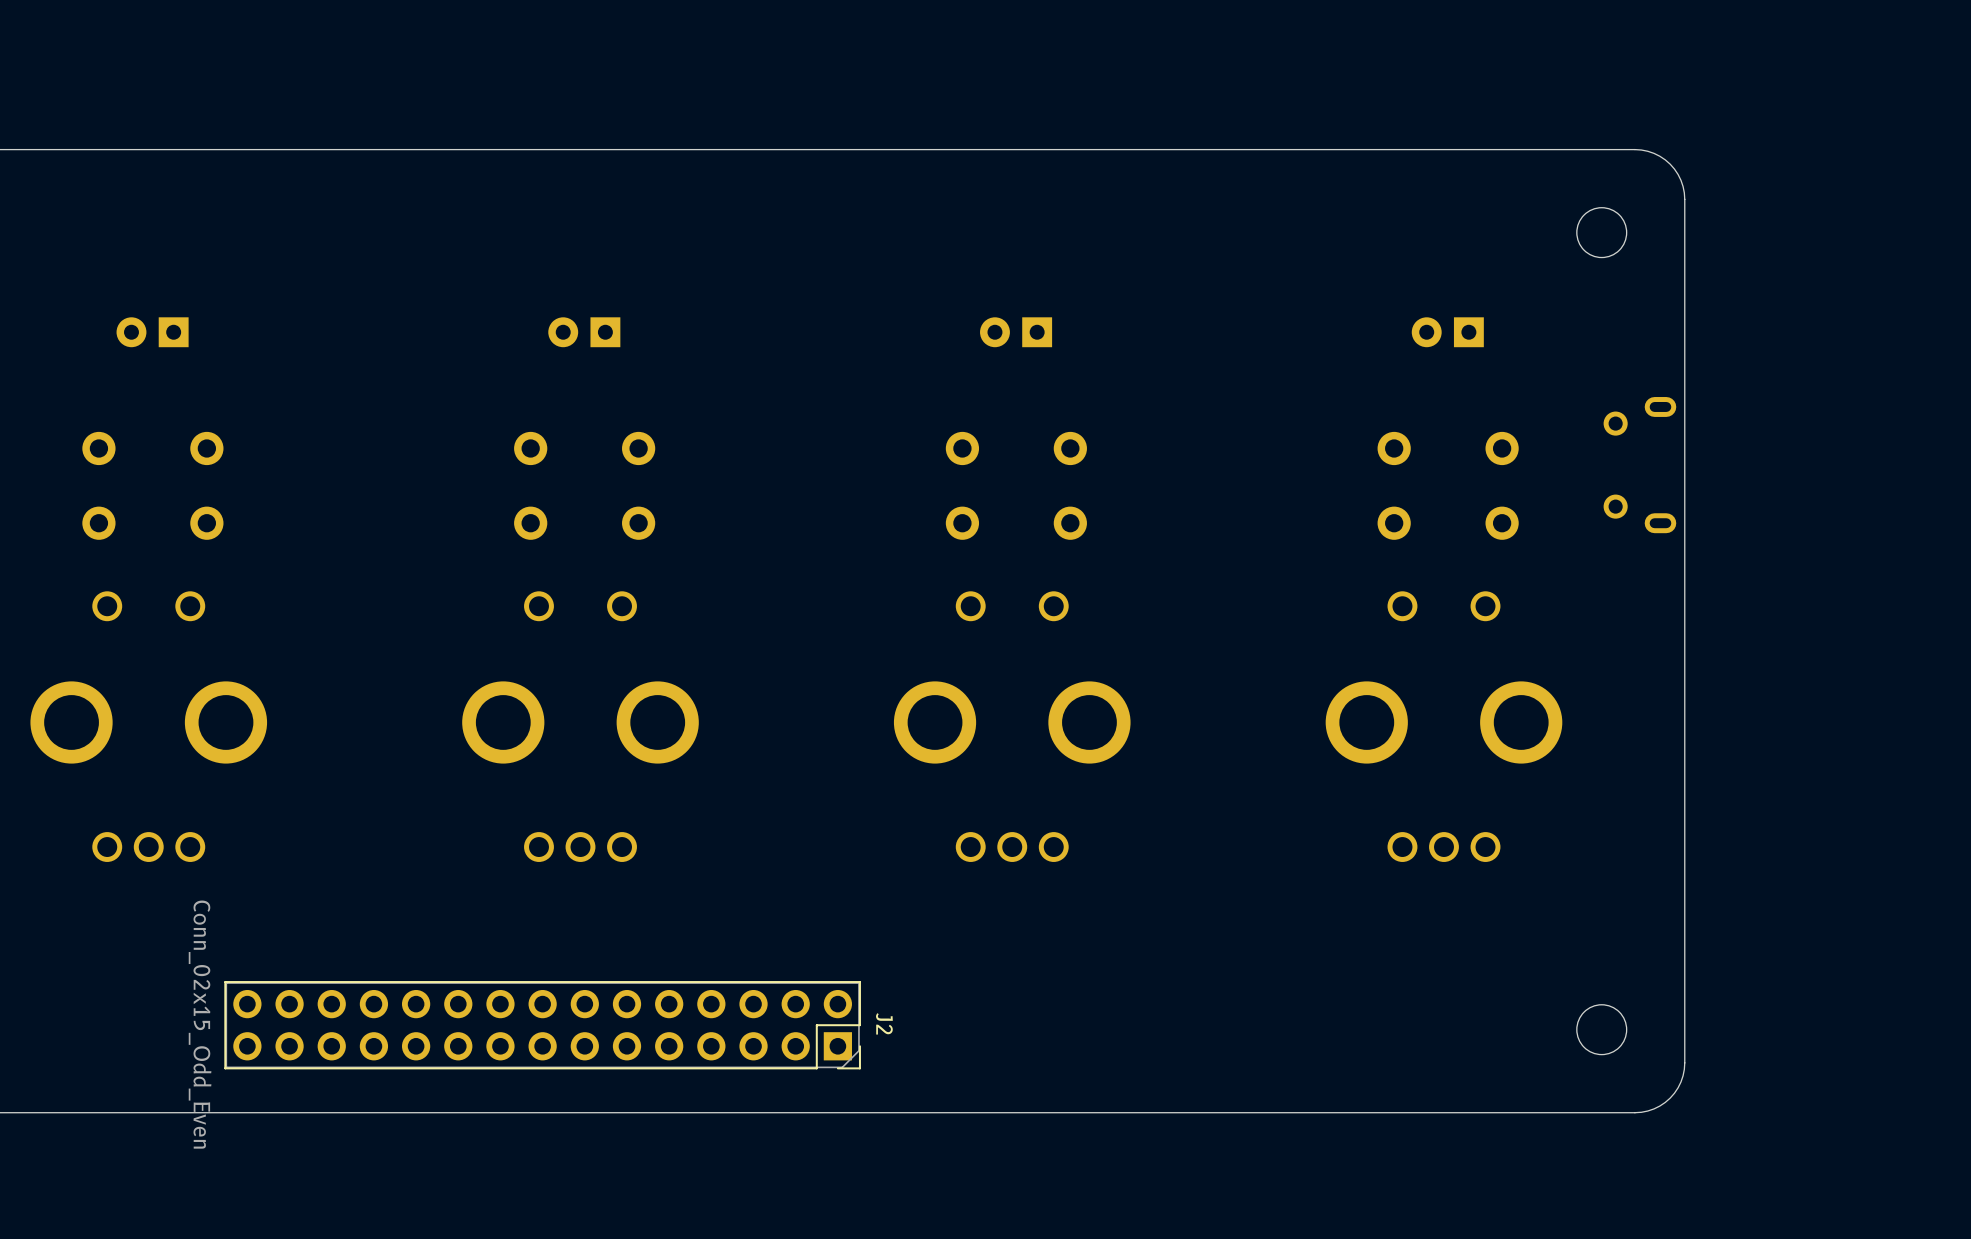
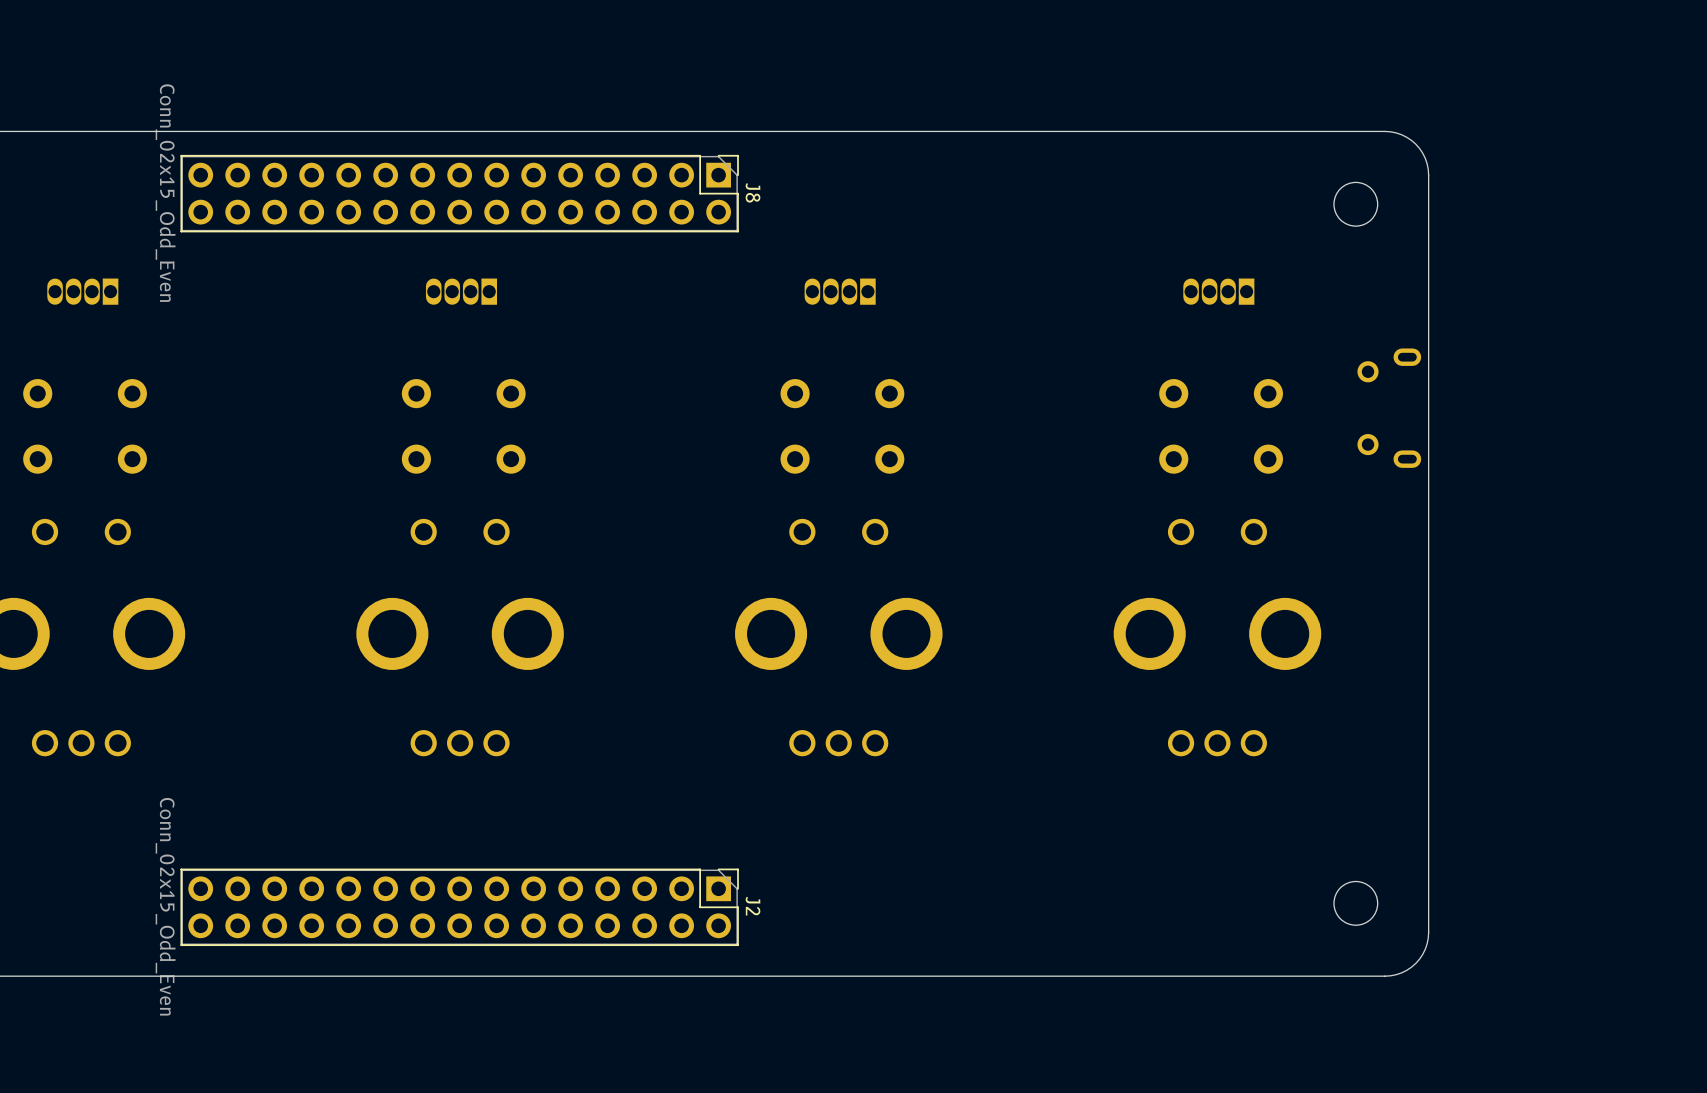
J8: none -> Conn_02x15_Odd_Even (459, 193)
part footprint: [116, 317, 189, 348] -> [47, 278, 119, 305]
part footprint: [548, 317, 621, 348] -> [425, 278, 498, 305]
part footprint: [980, 317, 1053, 348] -> [804, 278, 876, 305]
part footprint: [1411, 317, 1484, 348] -> [1183, 278, 1255, 305]
J2 footprint: [224, 981, 861, 1070] -> [180, 868, 739, 947]

